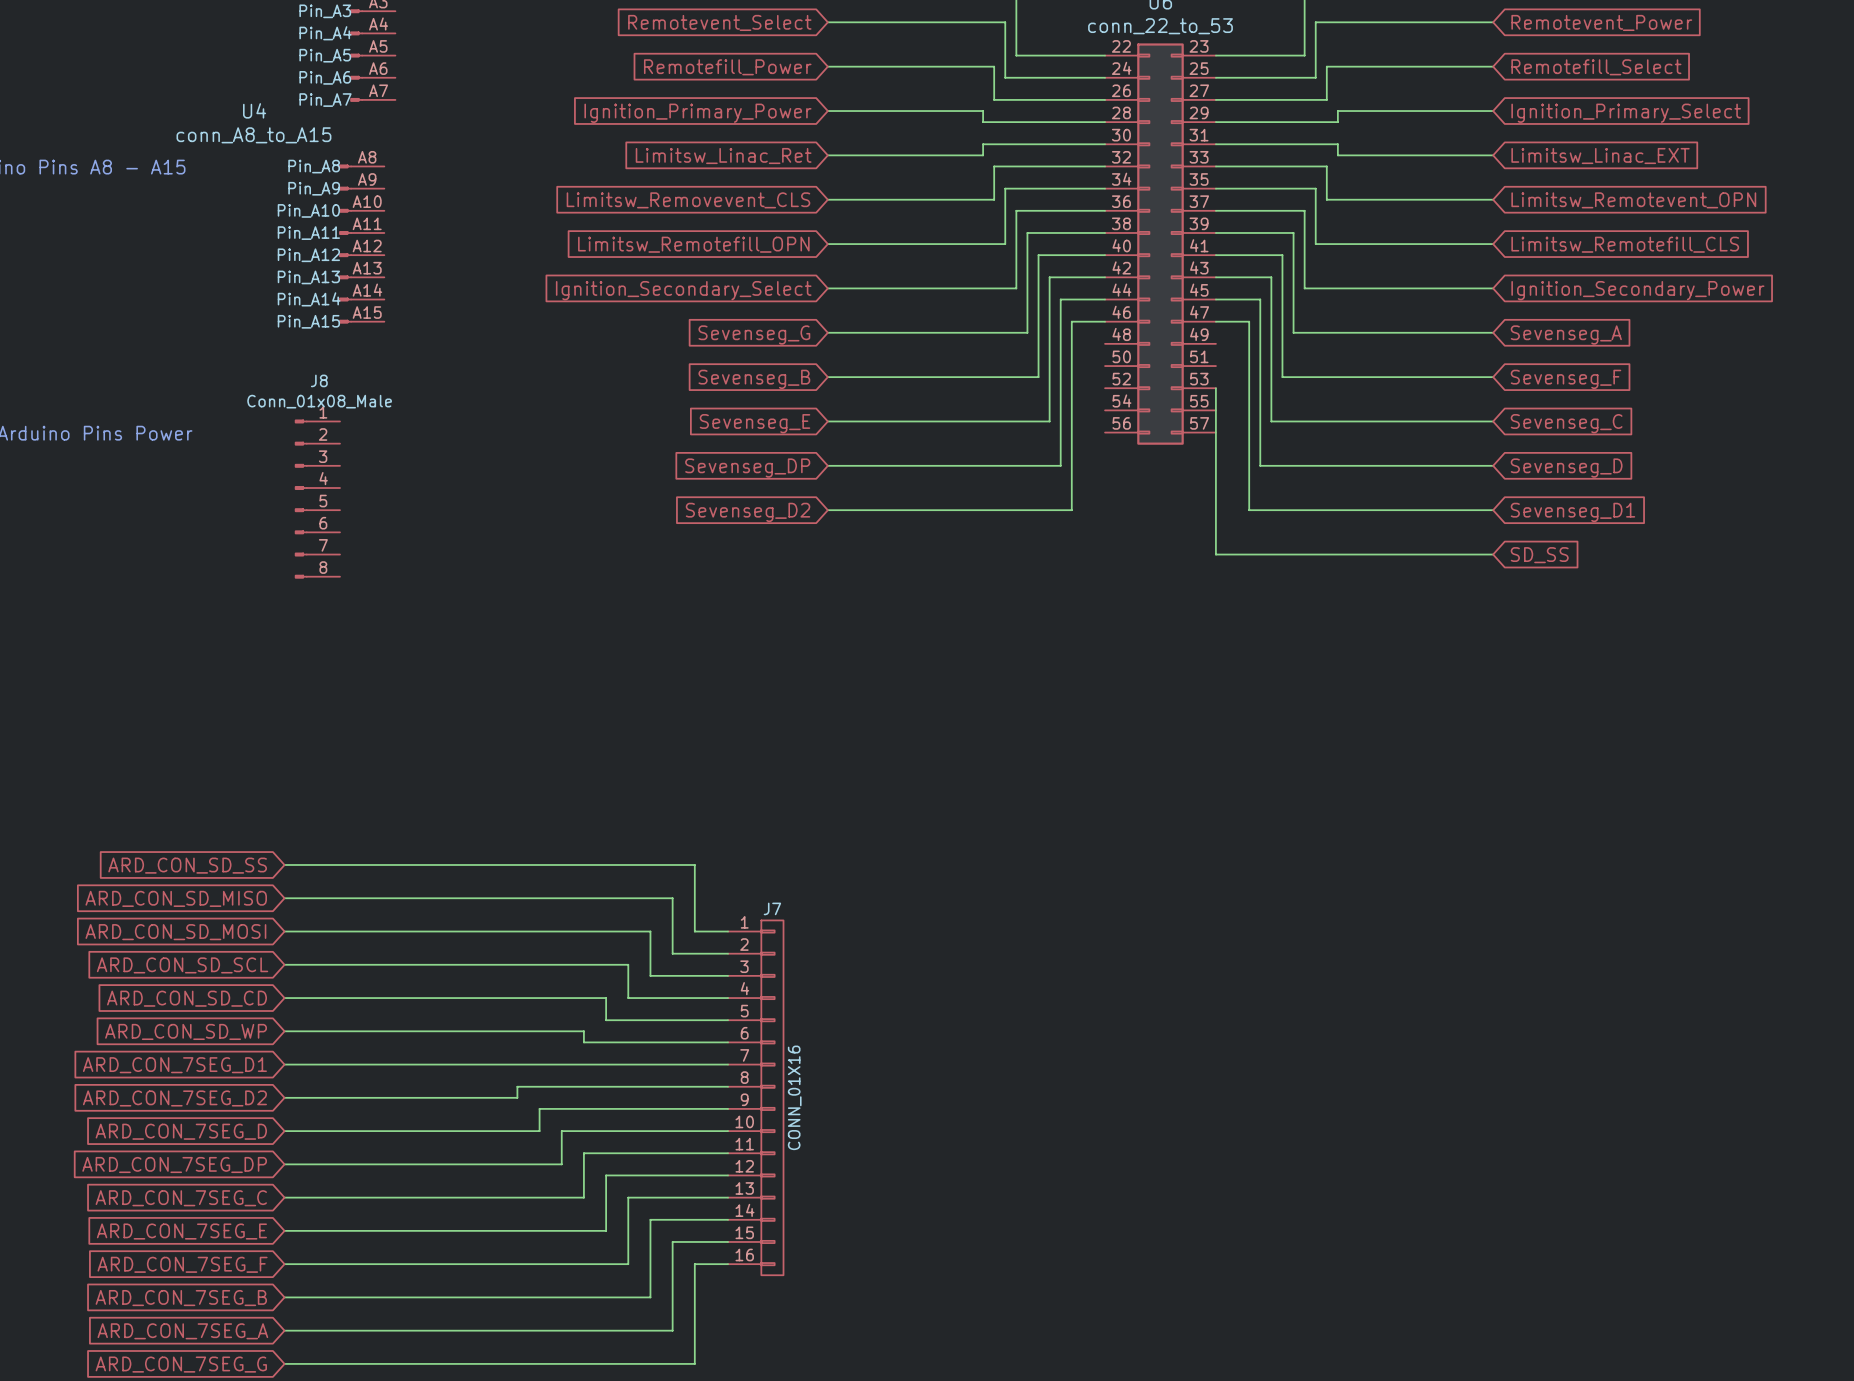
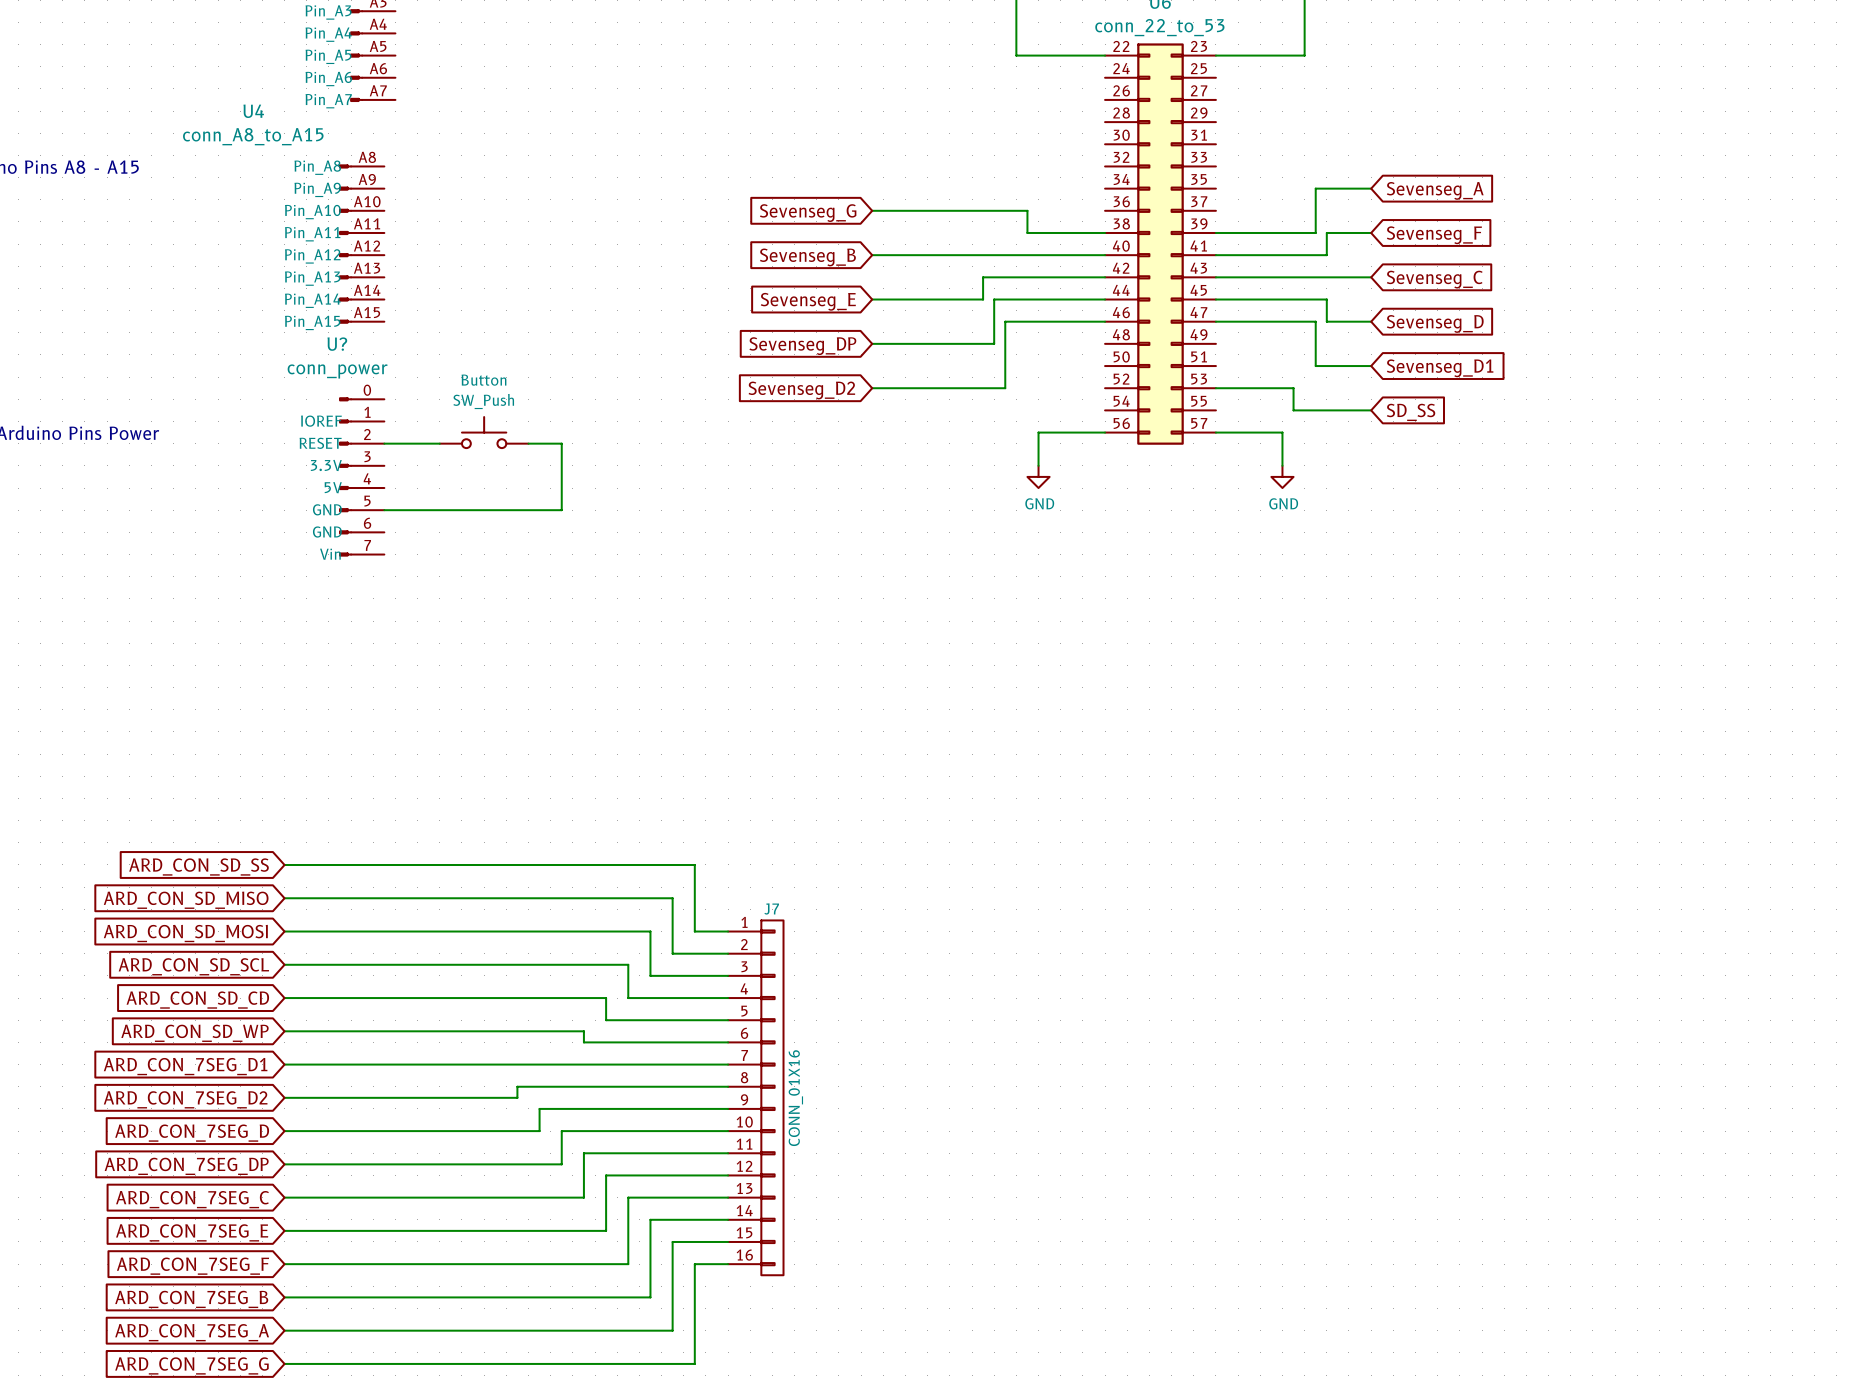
global label: Remotevent_Select (719, 22) -> none
wire: (827, 22) (1005, 22) (1005, 77) (1105, 77) -> none
wire: (1493, 22) (1315, 22) (1315, 77) (1215, 77) -> none
global label: Remotevent_Power (1601, 22) -> none
wire: (827, 66) (994, 66) (994, 99) (1105, 99) -> none
wire: (1493, 66) (1326, 66) (1326, 99) (1215, 99) -> none
global label: Remotefill_Power (727, 67) -> none
global label: Remotefill_Select (1596, 67) -> none
wire: (827, 111) (983, 111) (983, 122) (1105, 122) -> none
wire: (1493, 111) (1337, 111) (1337, 122) (1215, 122) -> none
global label: Ignition_Primary_Power (697, 113) -> none
global label: Ignition_Primary_Select (1626, 113) -> none
wire: (1105, 144) (983, 144) (983, 155) (827, 155) -> none
wire: (1215, 144) (1337, 144) (1337, 155) (1493, 155) -> none
global label: Limitsw_Linac_Ret (723, 156) -> none
global label: Limitsw_Linac_EXT (1600, 156) -> none
wire: (1105, 166) (994, 166) (994, 199) (827, 199) -> none
wire: (1215, 166) (1326, 166) (1326, 199) (1493, 199) -> none
wire: (1105, 188) (1005, 188) (1005, 244) (827, 244) -> none
wire: (1215, 188) (1315, 188) -> (1371, 188) (1315, 188)
global label: Limitsw_Removevent_CLS (688, 200) -> none
global label: Limitsw_Remotevent_OPN (1633, 200) -> none
wire: (1016, 210) (1016, 288) (827, 288) -> (1016, 210) (872, 210)
wire: (1027, 210) (1105, 210) -> (1027, 210) (1027, 232)
wire: (1215, 210) (1304, 210) (1304, 288) (1493, 288) -> none
wire: (1027, 232) (1027, 332) (827, 332) -> none
wire: (1293, 232) (1293, 332) (1493, 332) -> none
wire: (1315, 232) (1315, 244) (1493, 244) -> (1315, 232) (1293, 232)
global label: Limitsw_Remotefill_OPN (693, 244) -> none
global label: Limitsw_Remotefill_CLS (1625, 244) -> none
wire: (1038, 255) (1038, 377) (827, 377) -> (1038, 255) (872, 255)
wire: (1282, 255) (1282, 377) (1493, 377) -> (1282, 255) (1326, 255) (1326, 232) (1371, 232)
wire: (1049, 277) (1049, 421) (827, 421) -> (1049, 277) (983, 277) (983, 299) (872, 299)
wire: (1271, 277) (1271, 421) (1493, 421) -> (1271, 277) (1371, 277)
global label: Ignition_Secondary_Select (683, 290) -> none
global label: Ignition_Secondary_Power (1637, 290) -> none
wire: (1060, 299) (1060, 465) (827, 465) -> (1060, 299) (994, 299) (994, 343) (872, 343)
wire: (1260, 299) (1260, 465) (1493, 465) -> (1260, 299) (1326, 299) (1326, 321) (1371, 321)
wire: (1071, 321) (1071, 510) (827, 510) -> (1071, 321) (1005, 321) (1005, 388) (872, 388)
wire: (1249, 321) (1249, 510) (1493, 510) -> (1249, 321) (1315, 321) (1315, 366) (1371, 366)
global label position: Sevenseg_G (754, 334) -> Sevenseg_G (808, 213)
global label position: Sevenseg_A (1566, 334) -> Sevenseg_A (1435, 190)
global label position: Sevenseg_B (754, 379) -> Sevenseg_B (807, 257)
global label position: Sevenseg_F (1566, 379) -> Sevenseg_F (1434, 235)
wire: (1215, 388) (1215, 554) (1493, 554) -> (1215, 388) (1293, 388) (1293, 410) (1371, 410)
global label position: Sevenseg_E (754, 423) -> Sevenseg_E (808, 301)
global label position: Sevenseg_C (1566, 423) -> Sevenseg_C (1434, 279)
Button: none -> SW_Push (484, 432)
wire: none -> (1105, 432) (1038, 432) (1038, 465)
wire: none -> (1215, 432) (1282, 432) (1282, 465)
wire: none -> (384, 443) (439, 443)
wire: none -> (528, 443) (561, 443) (561, 510) (384, 510)
global label position: Sevenseg_DP (747, 468) -> Sevenseg_DP (802, 346)
global label position: Sevenseg_D (1566, 468) -> Sevenseg_D (1435, 323)
U?: none -> conn_power (361, 476)
power symbol: none -> GND (1038, 476)
power symbol: none -> GND (1282, 476)
J8: Conn_01x08_Male (317, 499) -> none
global label position: Sevenseg_D2 (748, 512) -> Sevenseg_D2 (801, 390)
global label position: Sevenseg_D1 (1572, 512) -> Sevenseg_D1 (1440, 368)
global label position: SD_SS (1539, 555) -> SD_SS (1411, 412)

